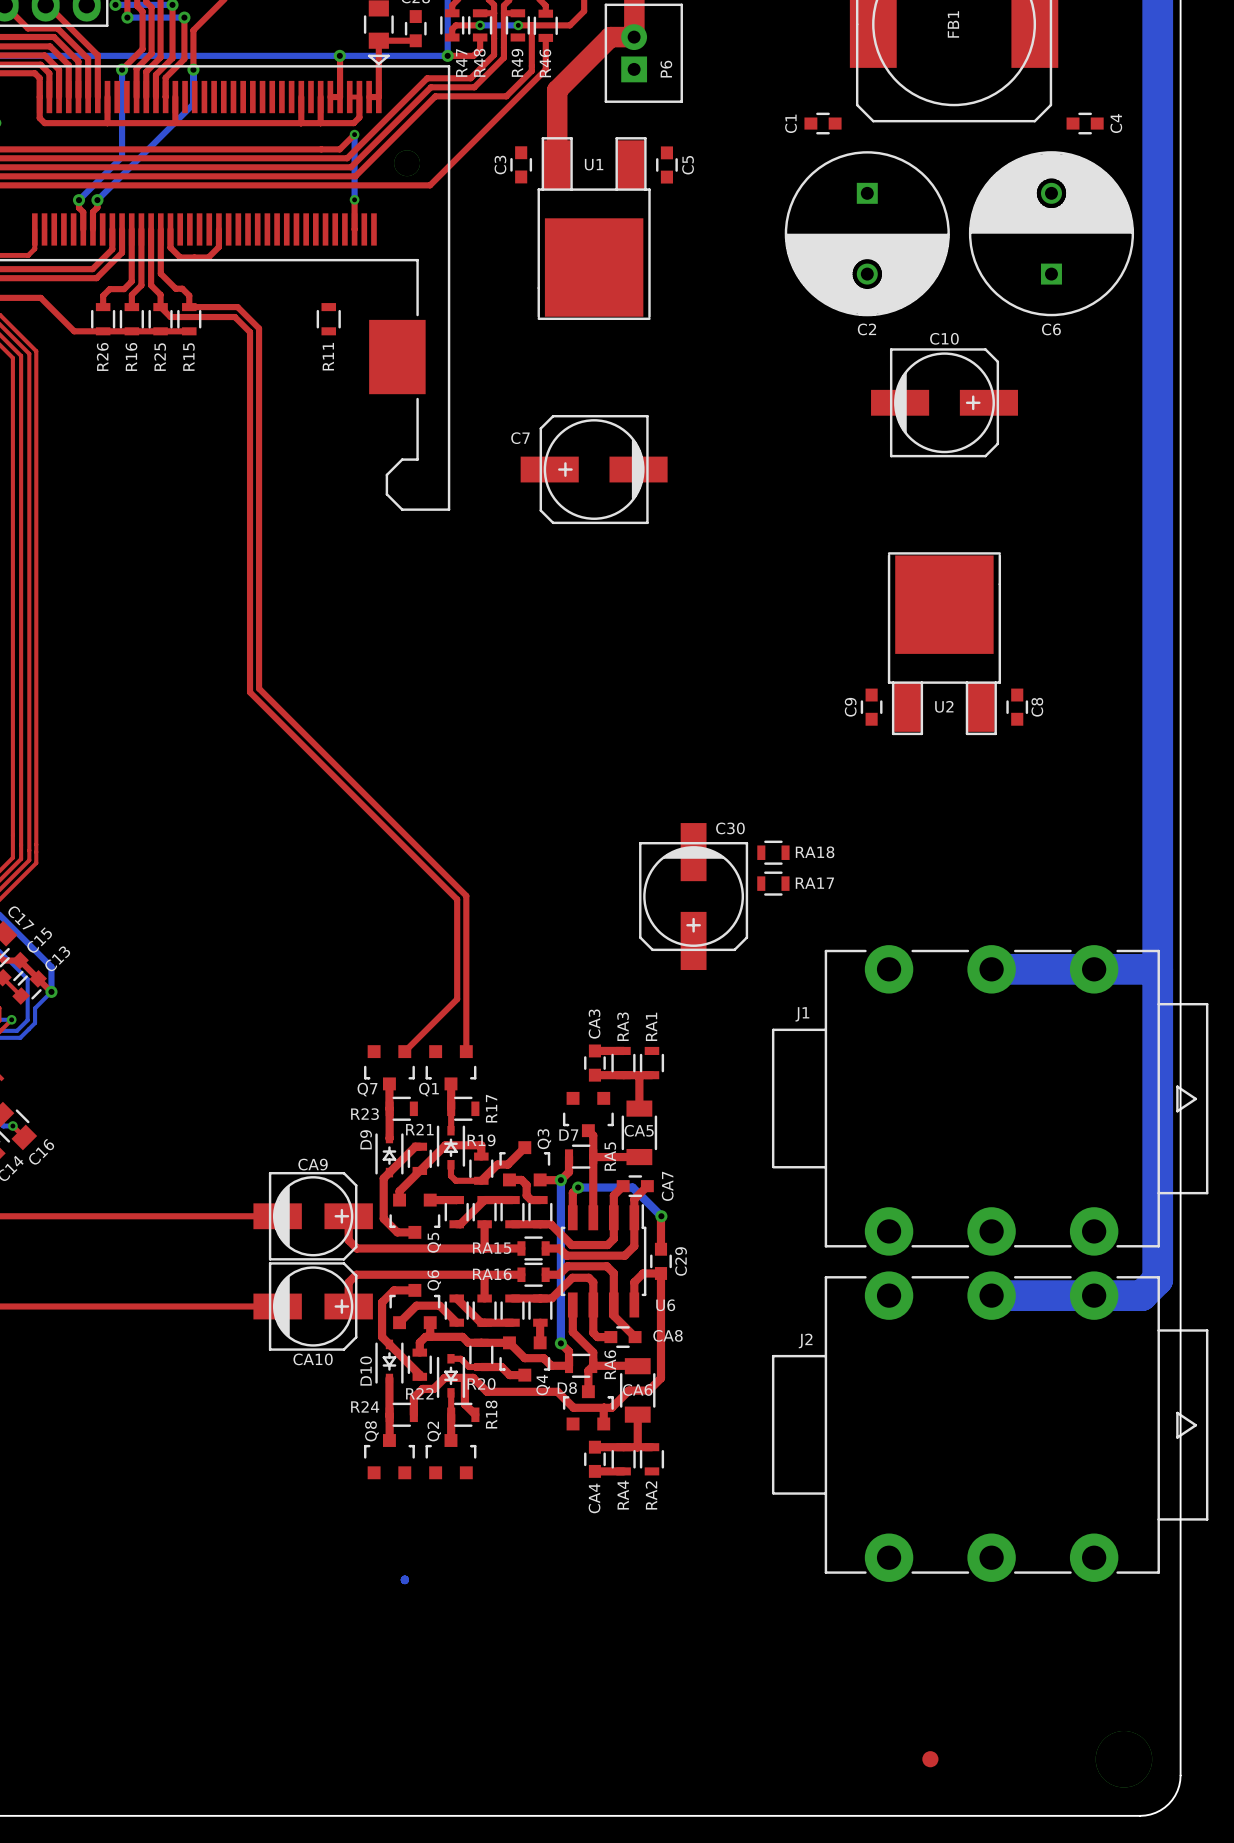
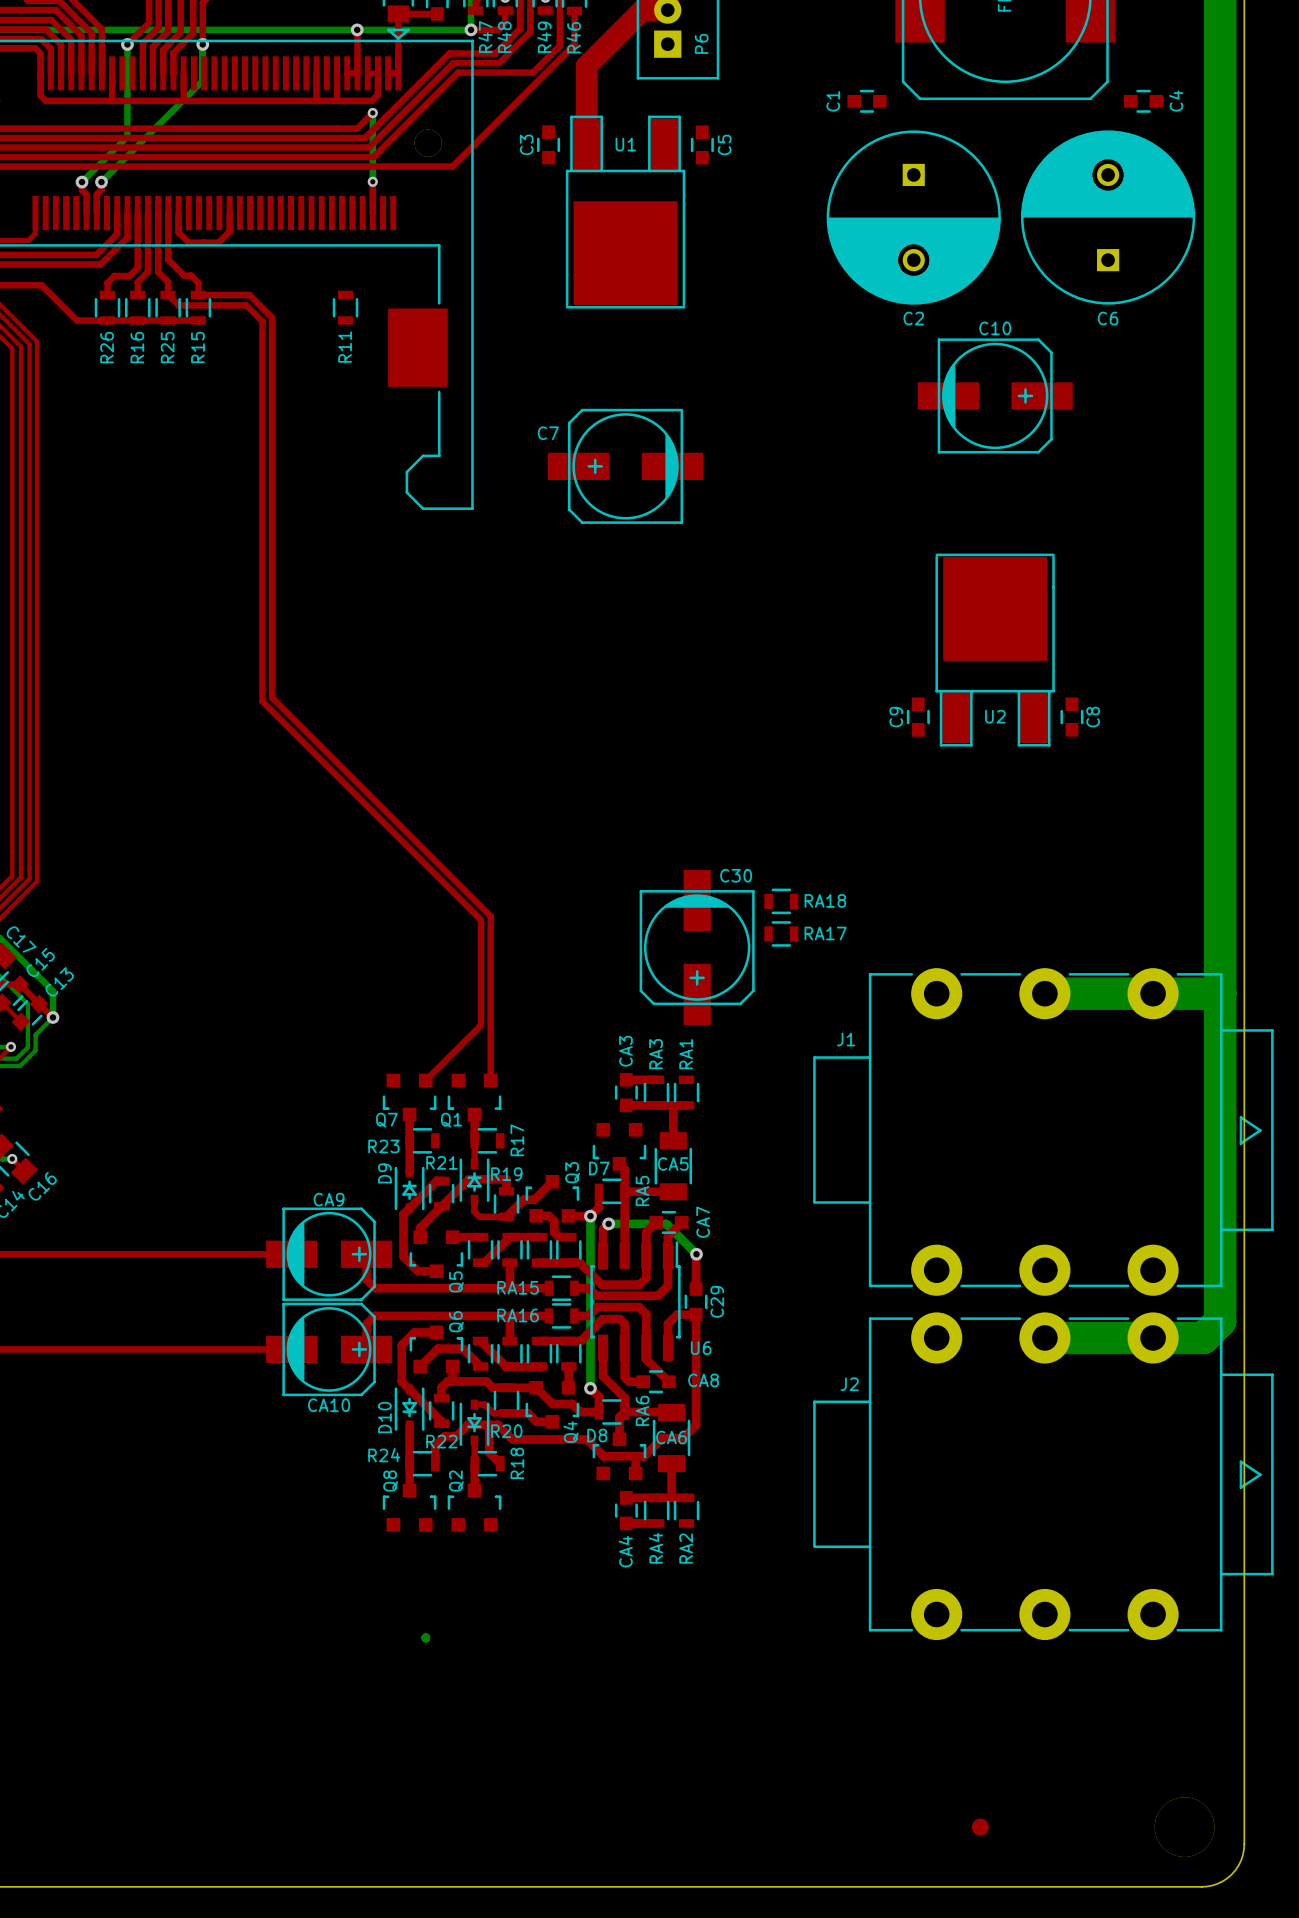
RA18 position: (773, 852) -> (781, 901)
RA17 position: (773, 883) -> (781, 933)
C30 position: (693, 896) -> (697, 947)

